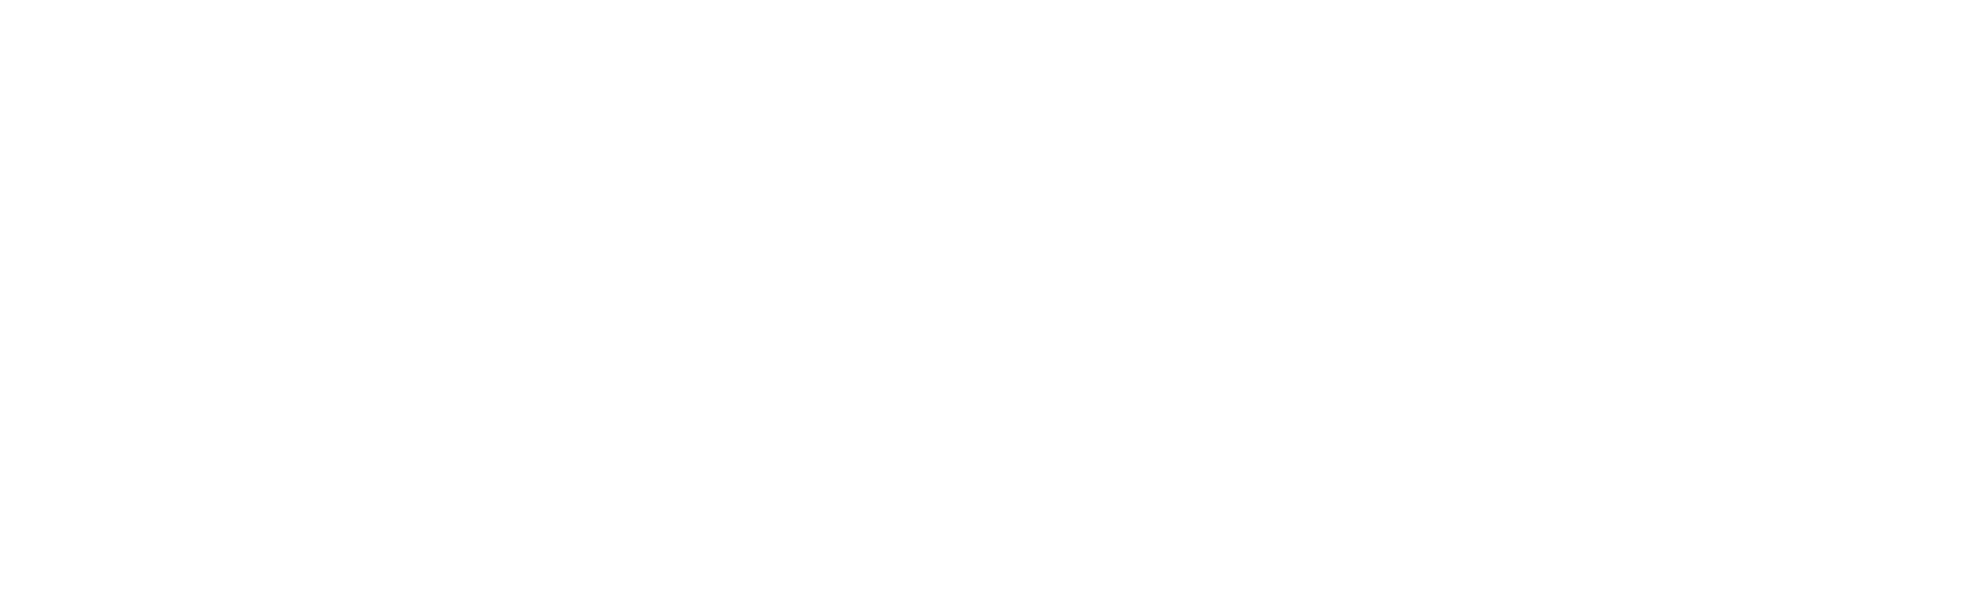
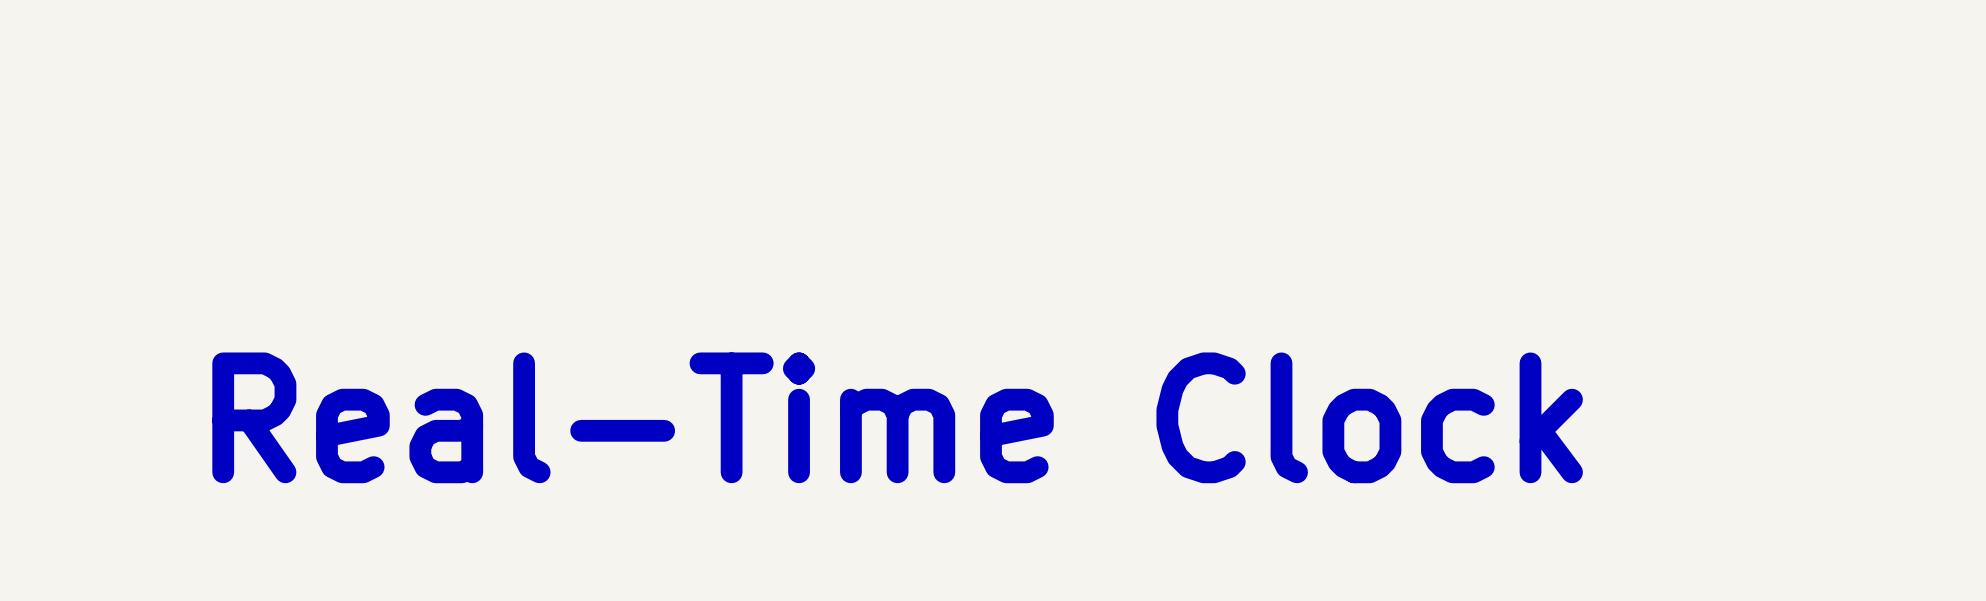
text: none -> Real-Time Clock (897, 417)

